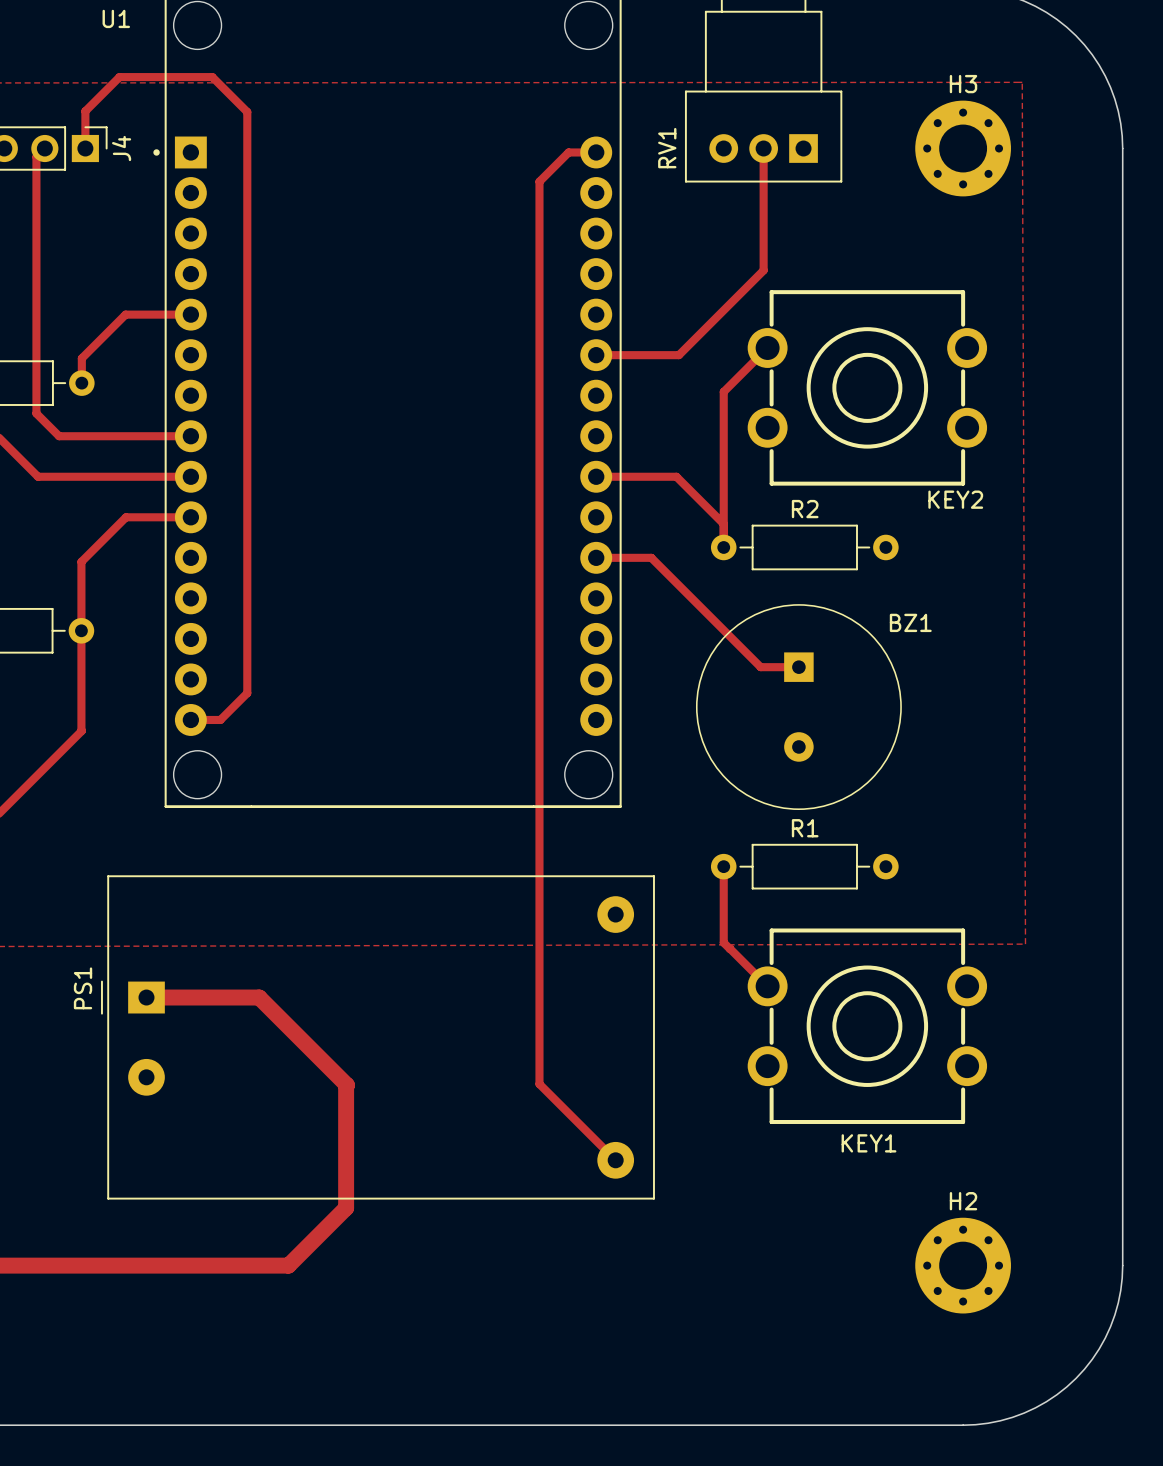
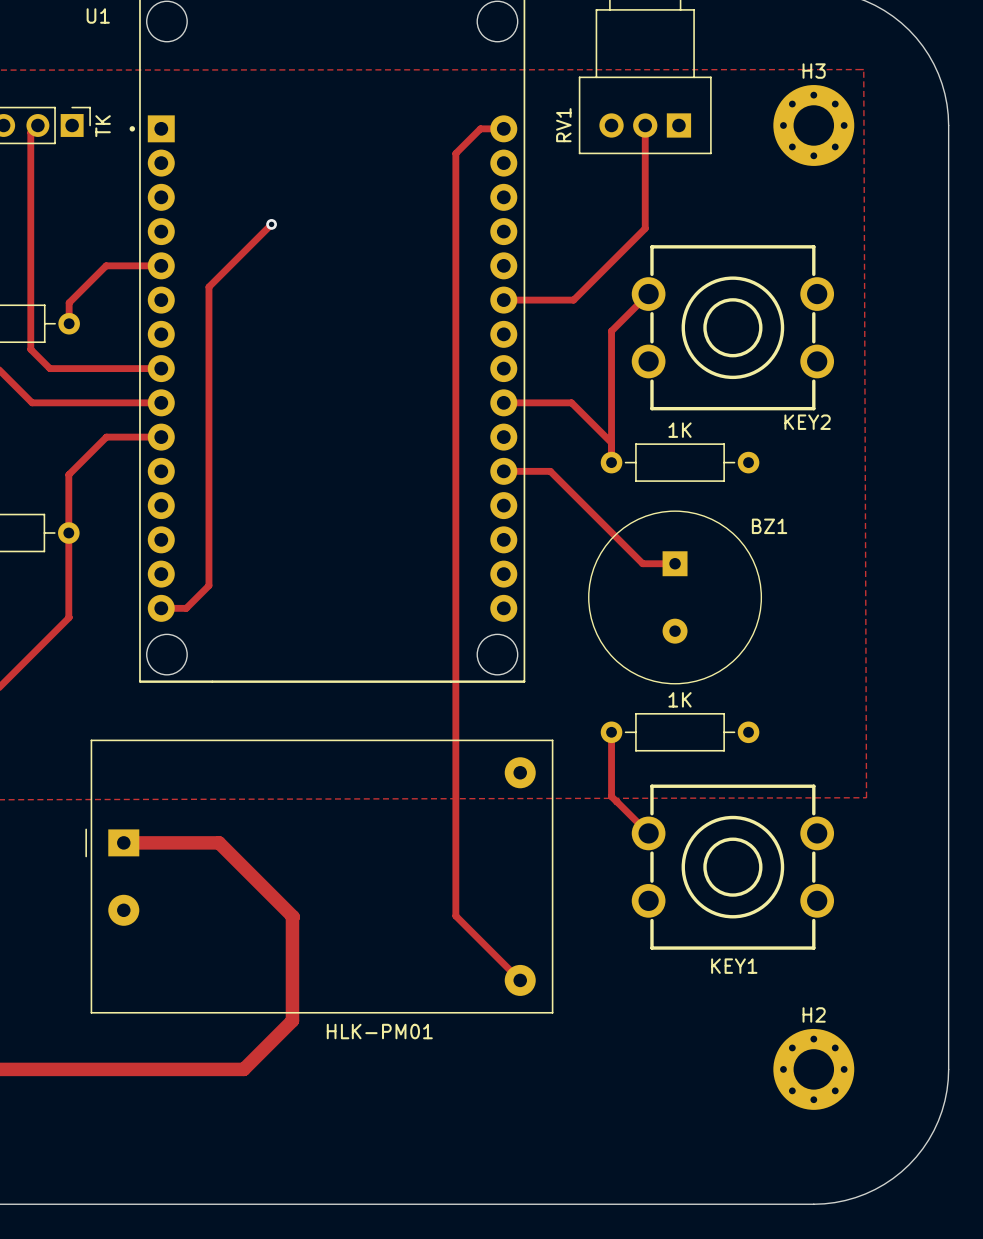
track: (85, 148) (85, 111) (119, 77) (212, 77) (247, 112) (247, 339) -> (271, 224) (208, 287)
J4 name: J4 (121, 148) -> TK (103, 126)
via: none -> (271, 224)
R2 name: R2 (805, 509) -> 1K (680, 430)
R1 name: R1 (805, 828) -> 1K (680, 699)
PS1 name: PS1 (83, 988) -> HLK-PM01 (379, 1031)

